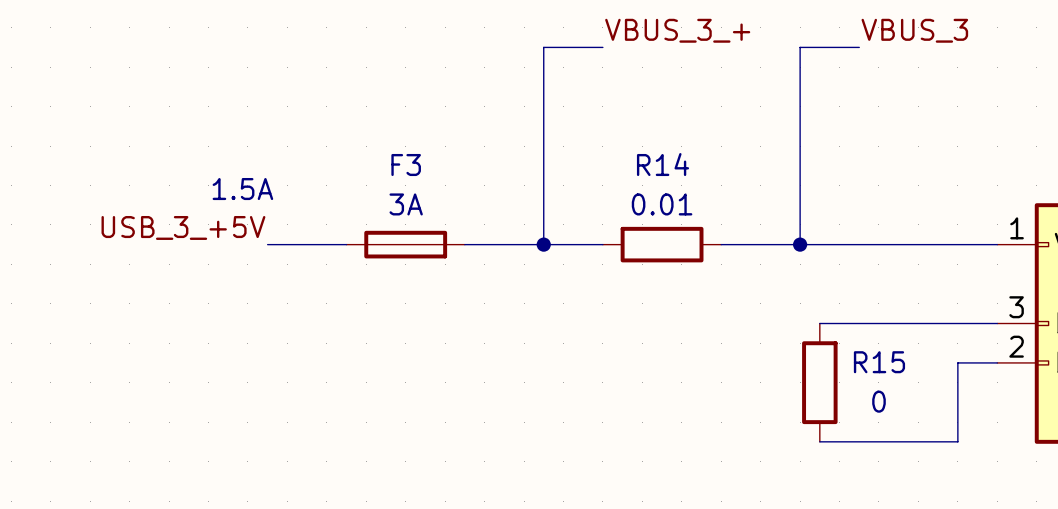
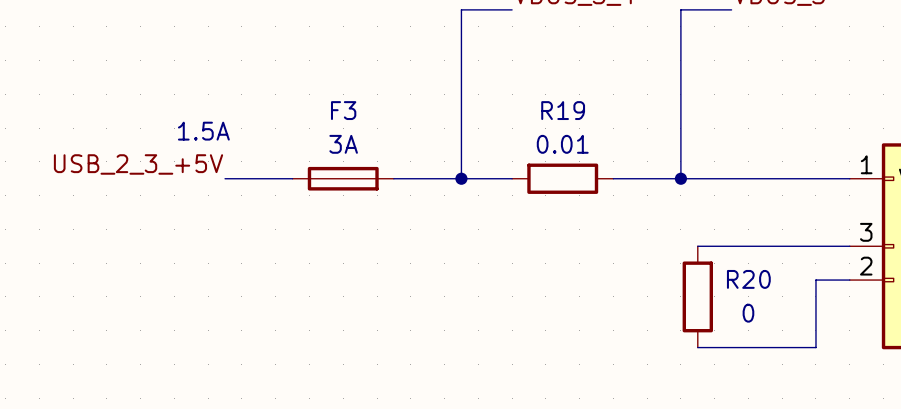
R14 name: R14 (663, 164) -> R19 (563, 110)
label: USB_3_+5V (183, 227) -> USB_2_3_+5V (138, 164)
R15 name: R15 (879, 362) -> R20 (748, 279)

